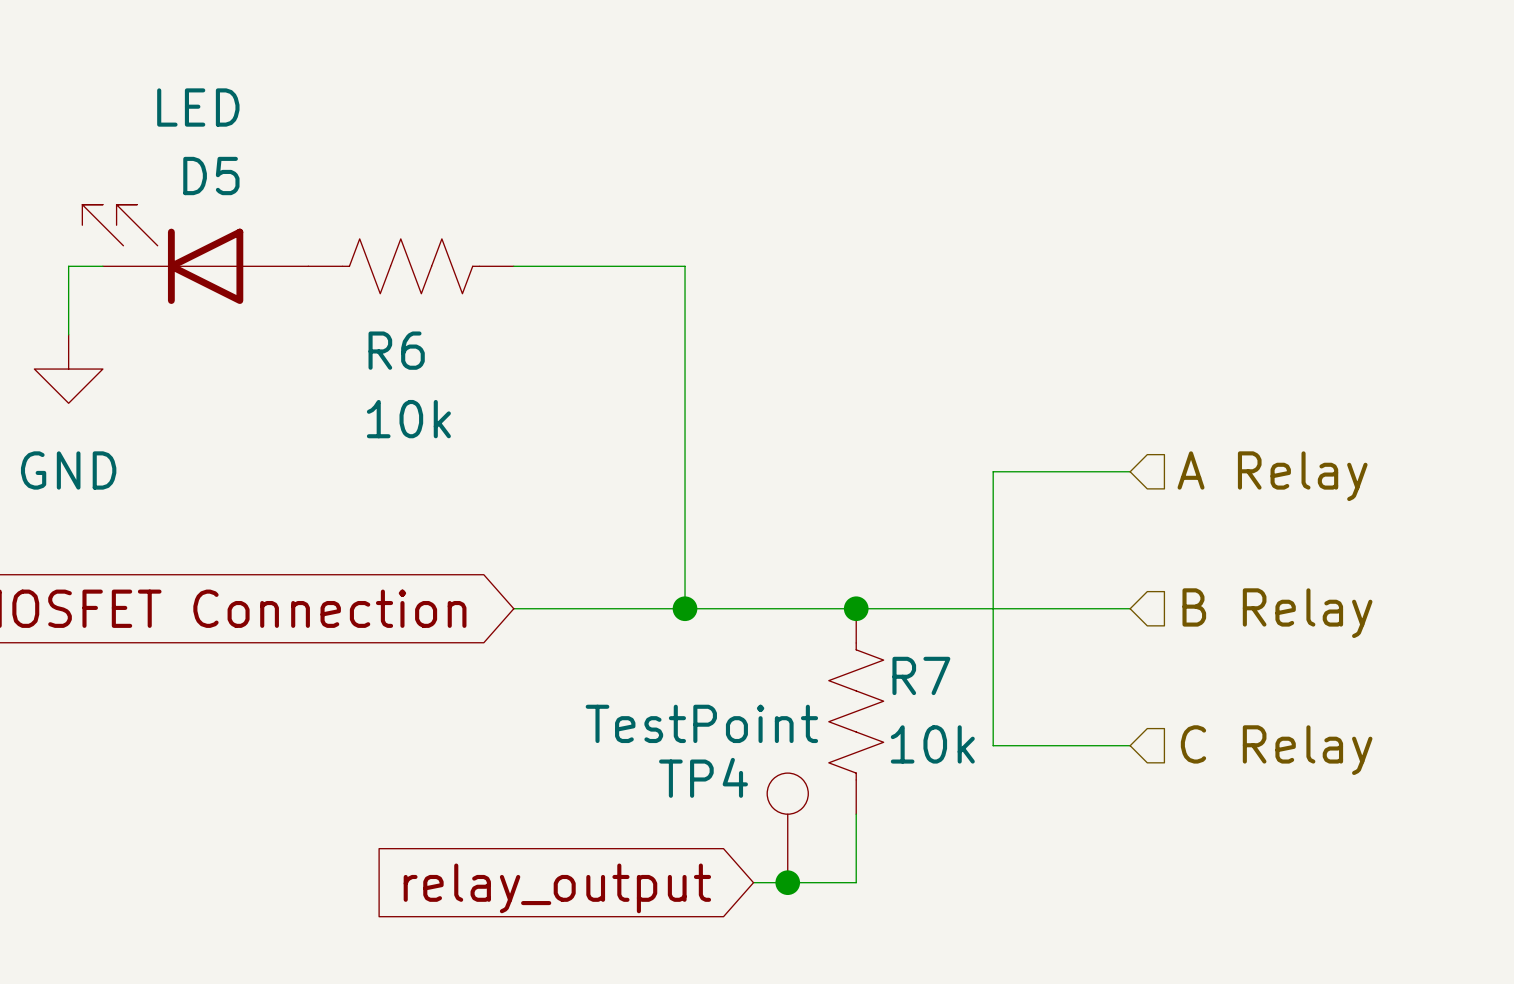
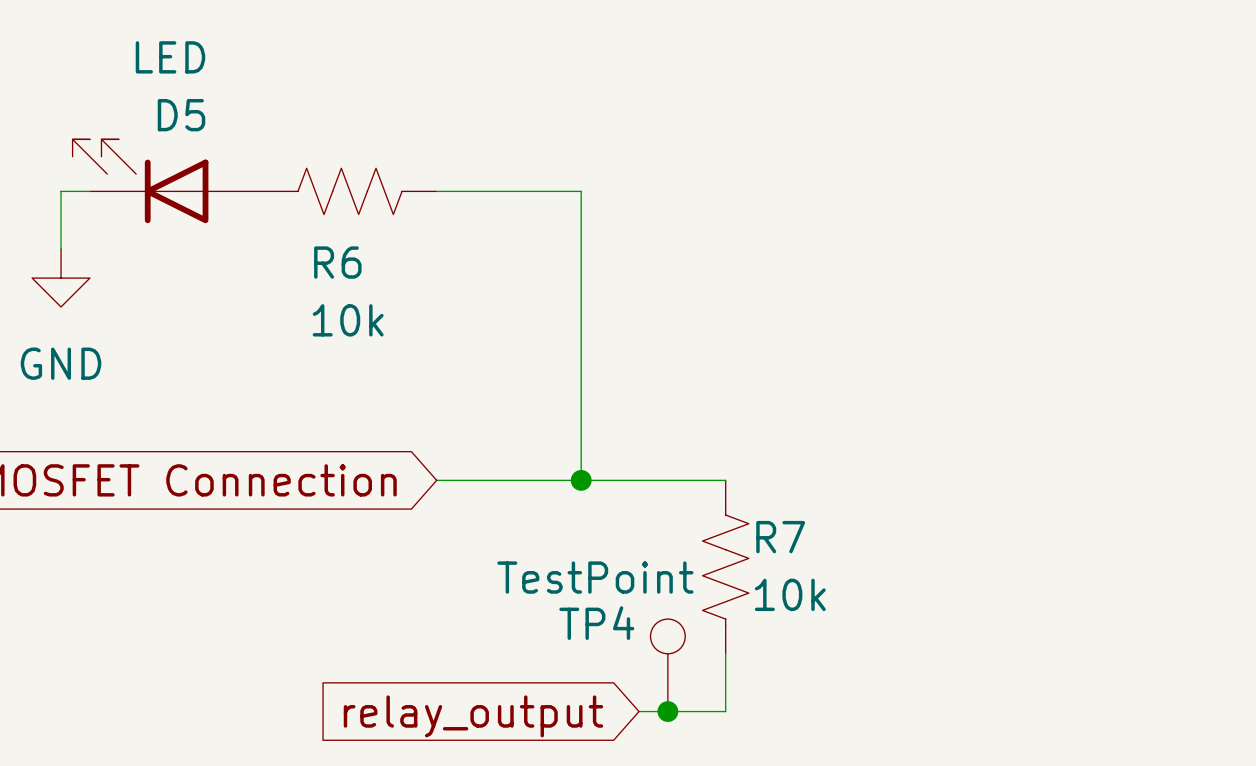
wire: (1130, 471) (993, 471) (993, 745) (1130, 745) -> none
hierarchical label: A Relay (1272, 476) -> none
wire: (856, 608) (1130, 608) -> none
junction: (856, 608) -> none
hierarchical label: B Relay (1277, 613) -> none
hierarchical label: C Relay (1276, 750) -> none

